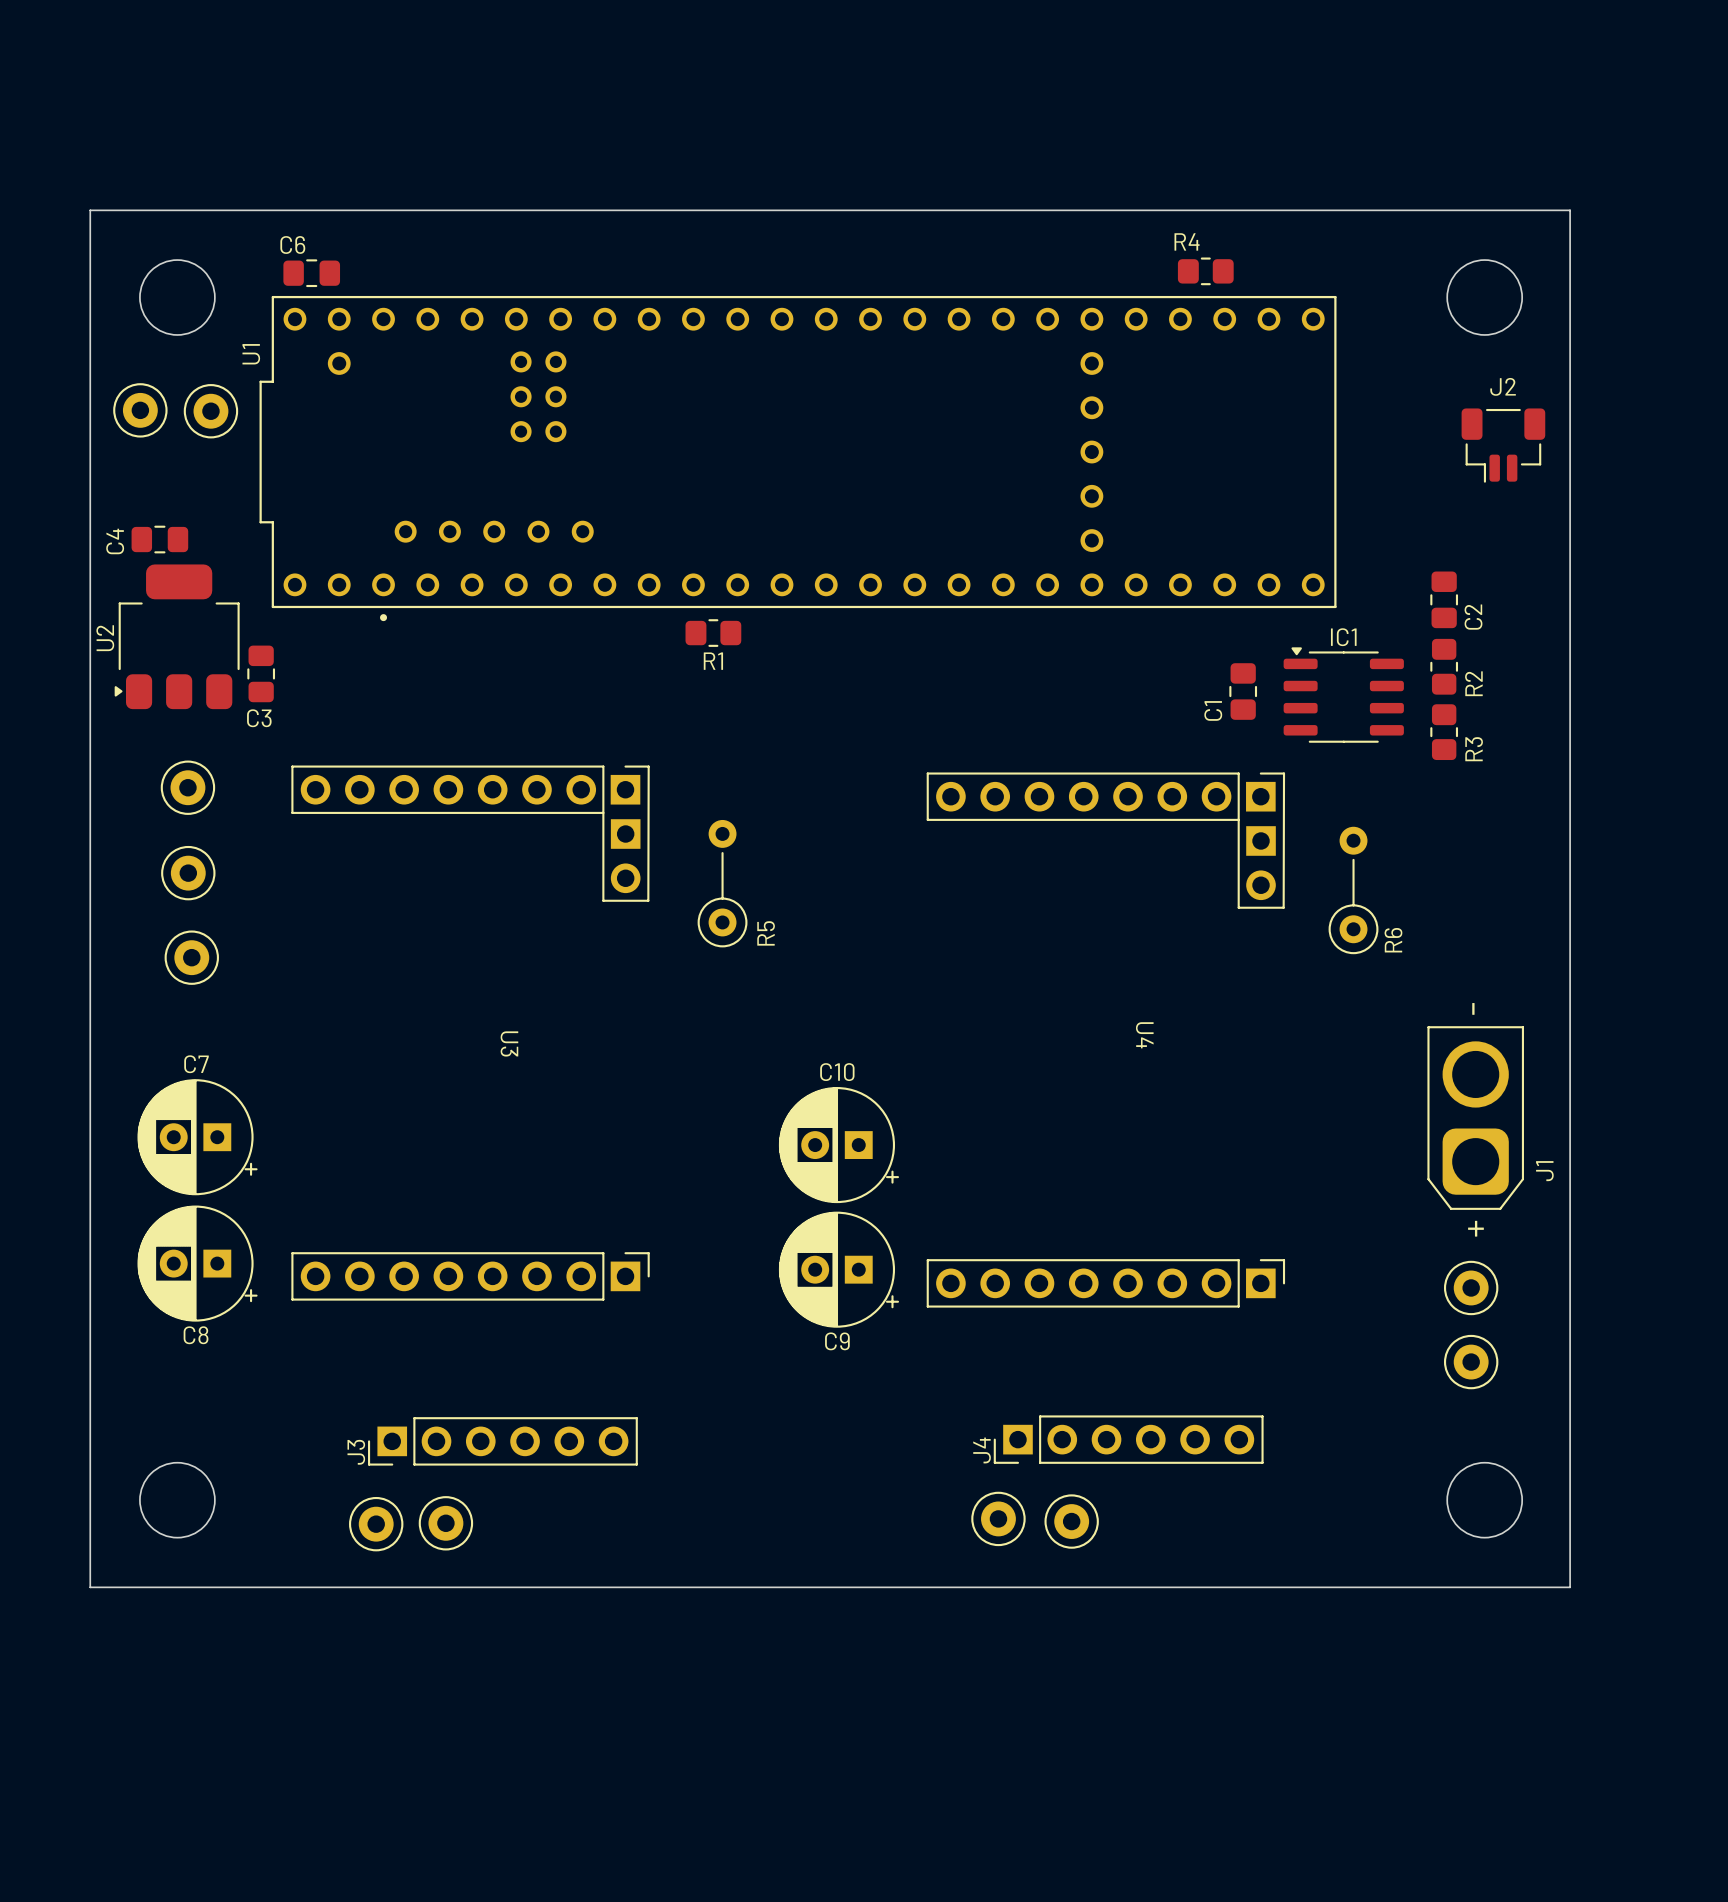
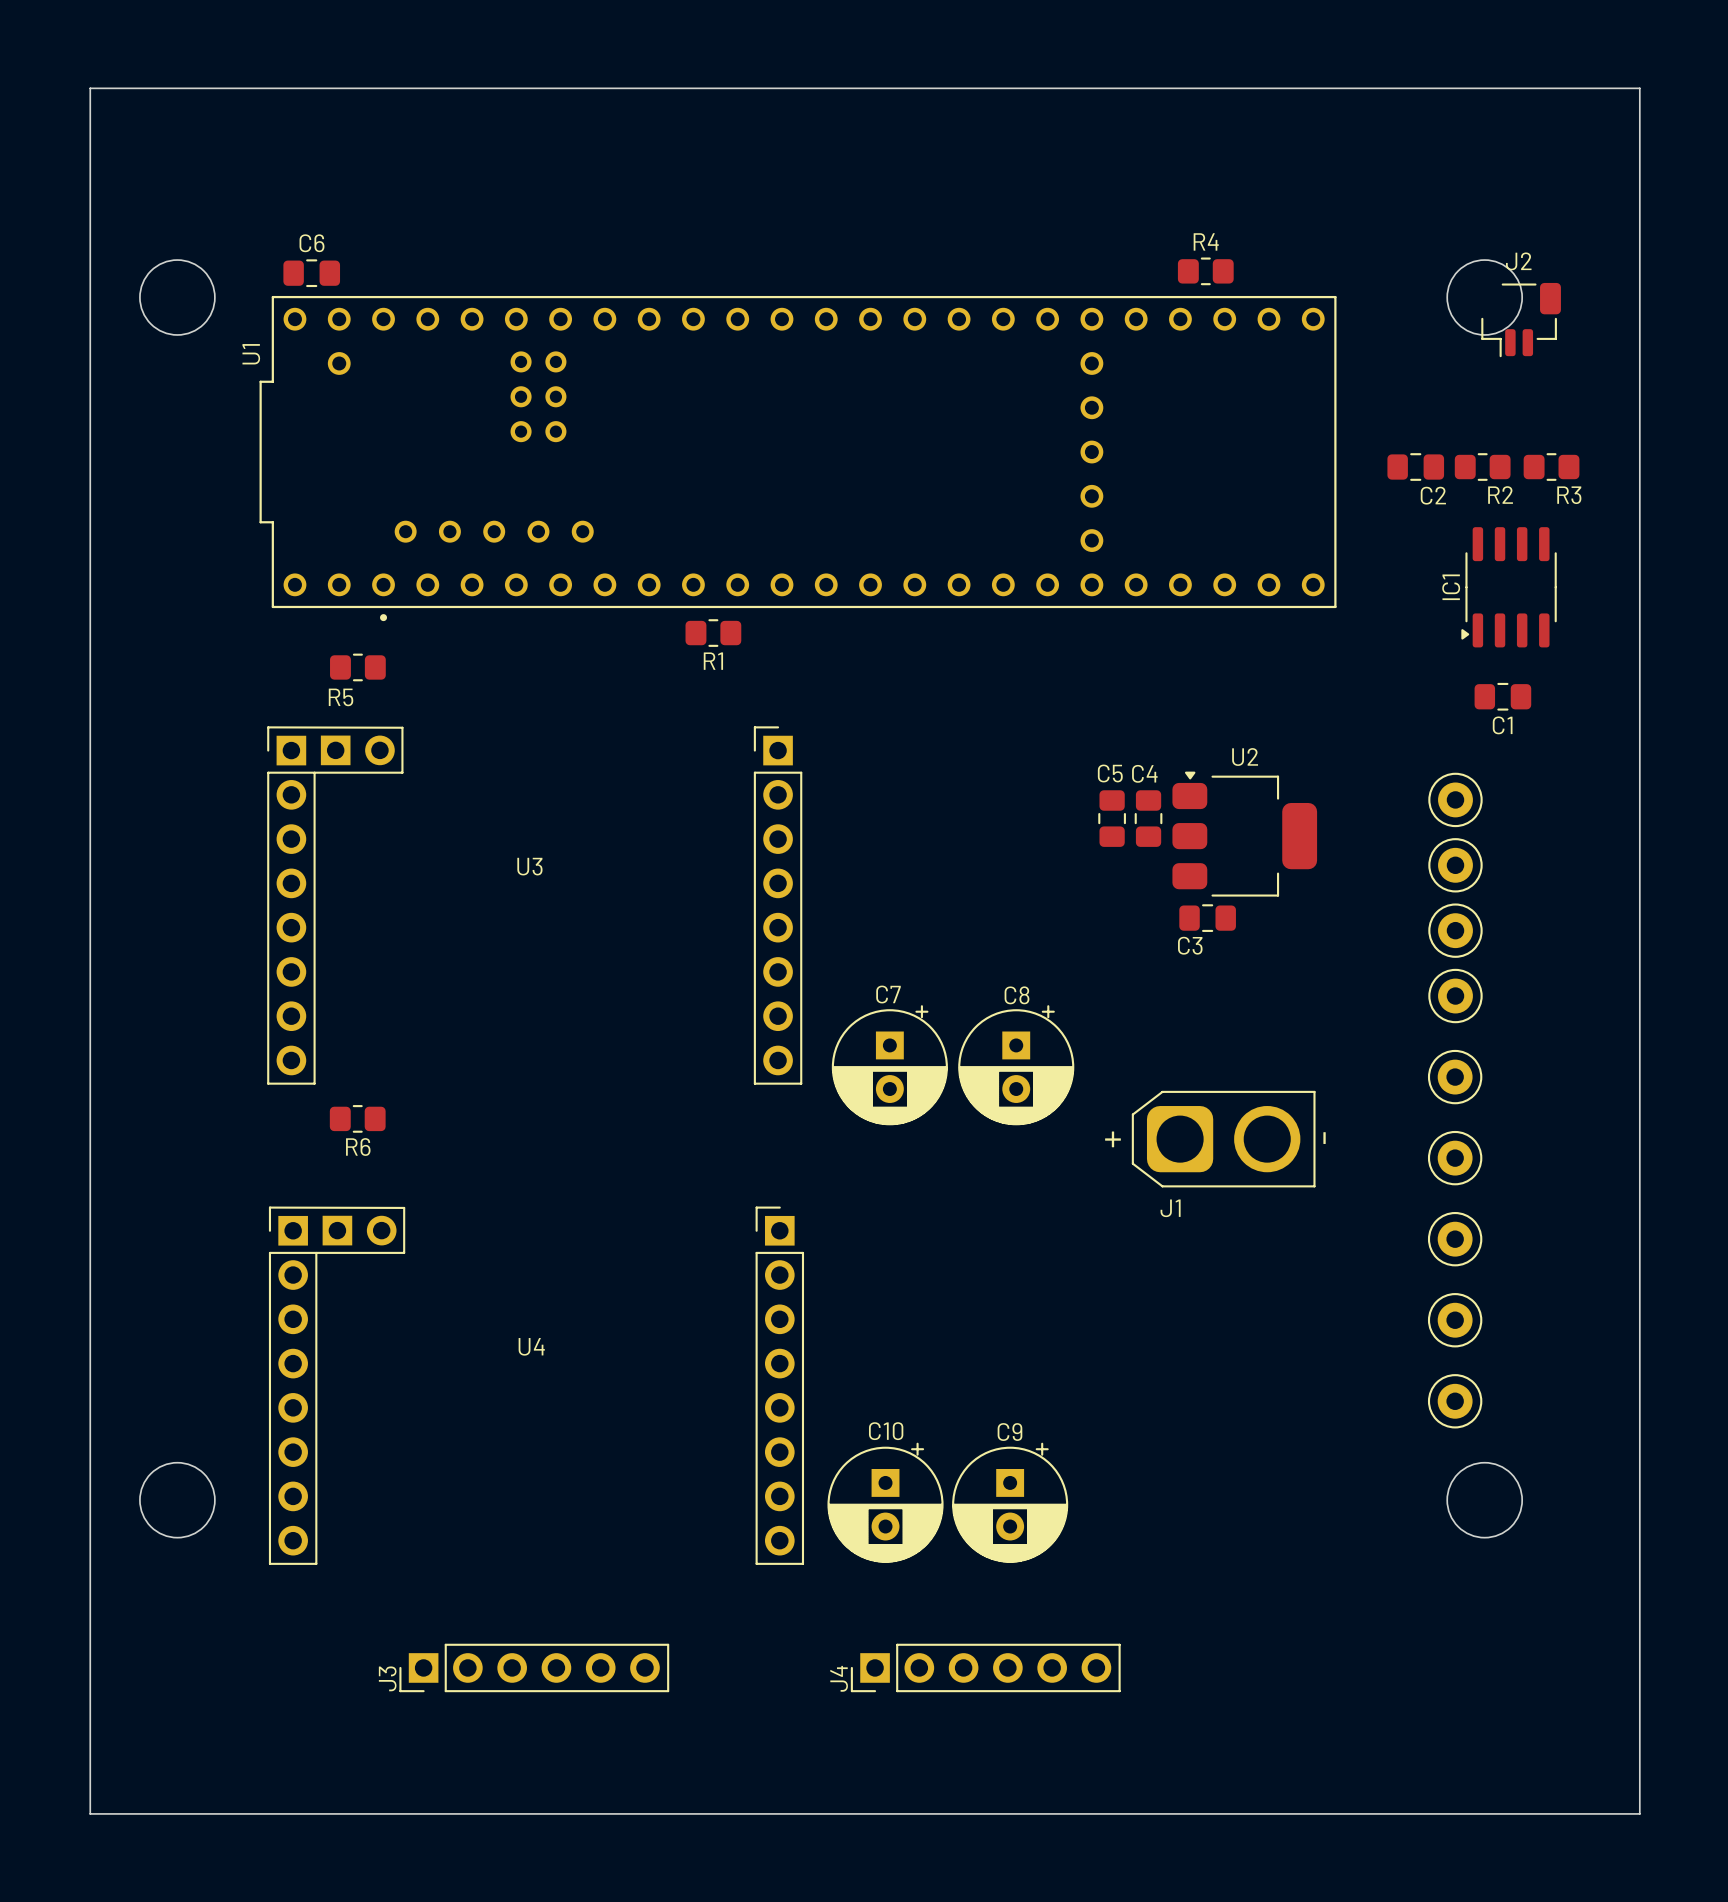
board edge: (90, 210) (1570, 210) (1570, 1587) (90, 1587) -> (90, 210) (90, 88) (1639, 88) (1639, 1813) (90, 1813) (90, 1587)
R4 name position: R4 (1187, 241) -> R4 (1206, 241)
C6 name position: C6 (292, 245) -> C6 (311, 243)
part: (140, 410) -> none
part: (210, 411) -> none
J2 position: (1503, 445) -> (1519, 320)
C4 rotation: 0° (159, 539) -> 90° clockwise (1148, 818)
C4 position: (159, 539) -> (1148, 818)
C2 rotation: 0° (1444, 599) -> 90° clockwise (1415, 467)
C2 position: (1444, 599) -> (1415, 467)
U2 rotation: 0° (177, 636) -> 90° clockwise (1244, 834)
U2 position: (177, 636) -> (1244, 834)
R2 rotation: 0° (1444, 666) -> 90° clockwise (1482, 467)
R2 position: (1444, 666) -> (1482, 467)
C3 rotation: 0° (261, 673) -> 90° clockwise (1207, 918)
C3 position: (261, 673) -> (1207, 918)
C1 rotation: 0° (1243, 691) -> 90° clockwise (1502, 696)
C1 position: (1243, 691) -> (1502, 696)
IC1 rotation: 0° (1343, 695) -> 90° counterclockwise (1509, 587)
IC1 position: (1343, 695) -> (1509, 587)
R3 rotation: 0° (1444, 732) -> 90° clockwise (1551, 467)
R3 position: (1444, 732) -> (1551, 467)
part: (187, 787) -> none
part: none -> (1455, 799)
C5: none -> (1112, 818)
R5 footprint: [697, 819, 748, 948] -> [330, 653, 386, 682]
R6 footprint: [1328, 826, 1379, 955] -> [329, 1105, 386, 1133]
part: none -> (1455, 865)
part: (188, 873) -> none
part: none -> (1455, 930)
R5 name position: R5 (766, 933) -> R5 (341, 697)
R6 name position: R6 (1393, 940) -> R6 (358, 1147)
part: (191, 957) -> none
part: none -> (1455, 996)
J1 footprint: [1427, 1026, 1524, 1210] -> [1131, 1090, 1316, 1188]
U3 rotation: 0° (470, 1033) -> 90° counterclockwise (534, 905)
U4 rotation: 0° (1105, 1040) -> 90° counterclockwise (536, 1385)
U4 position: (1105, 1040) -> (536, 1385)
part: none -> (1455, 1077)
C7 rotation: 0° (197, 1137) -> 90° counterclockwise (889, 1065)
C7 position: (197, 1137) -> (889, 1065)
C10 rotation: 0° (838, 1145) -> 90° counterclockwise (885, 1502)
C10 position: (838, 1145) -> (885, 1502)
part: none -> (1455, 1158)
J1 name position: J1 (1544, 1171) -> J1 (1170, 1208)
part: none -> (1455, 1239)
C8 rotation: 0° (197, 1263) -> 90° counterclockwise (1016, 1065)
C8 position: (197, 1263) -> (1016, 1065)
C9 rotation: 0° (838, 1269) -> 90° counterclockwise (1010, 1502)
C9 position: (838, 1269) -> (1010, 1502)
part: (1471, 1287) -> none
part: none -> (1455, 1320)
C8 name position: C8 (196, 1335) -> C8 (1016, 995)
C9 name position: C9 (837, 1341) -> C9 (1009, 1432)
part: (1471, 1362) -> none
part: none -> (1455, 1401)
J4 position: (1128, 1439) -> (985, 1667)
J3 position: (502, 1441) -> (534, 1667)
part: (998, 1518) -> none
part: (1071, 1521) -> none
part: (445, 1523) -> none
part: (376, 1524) -> none

